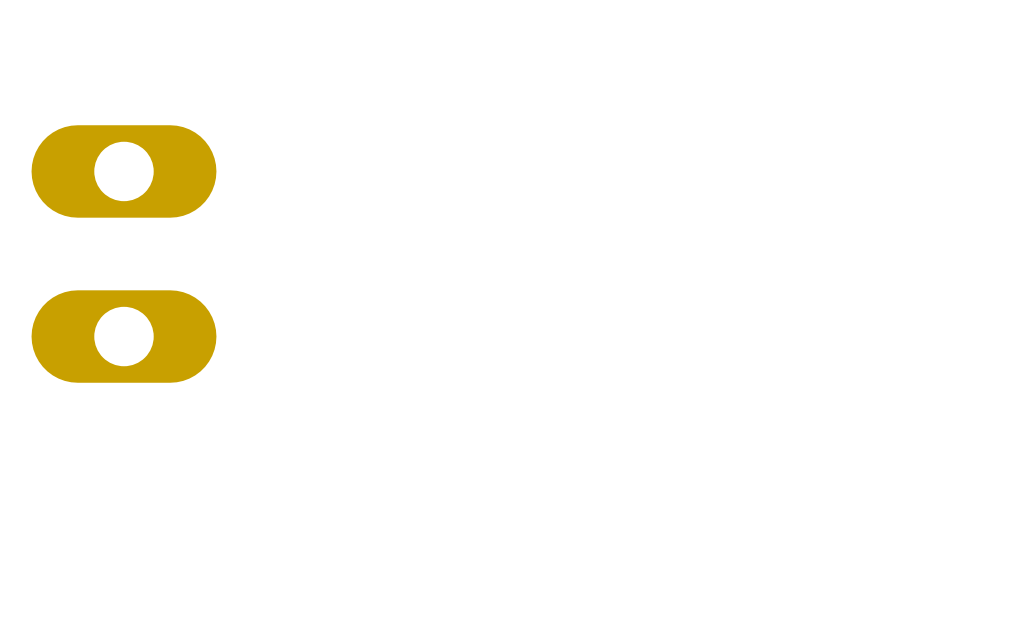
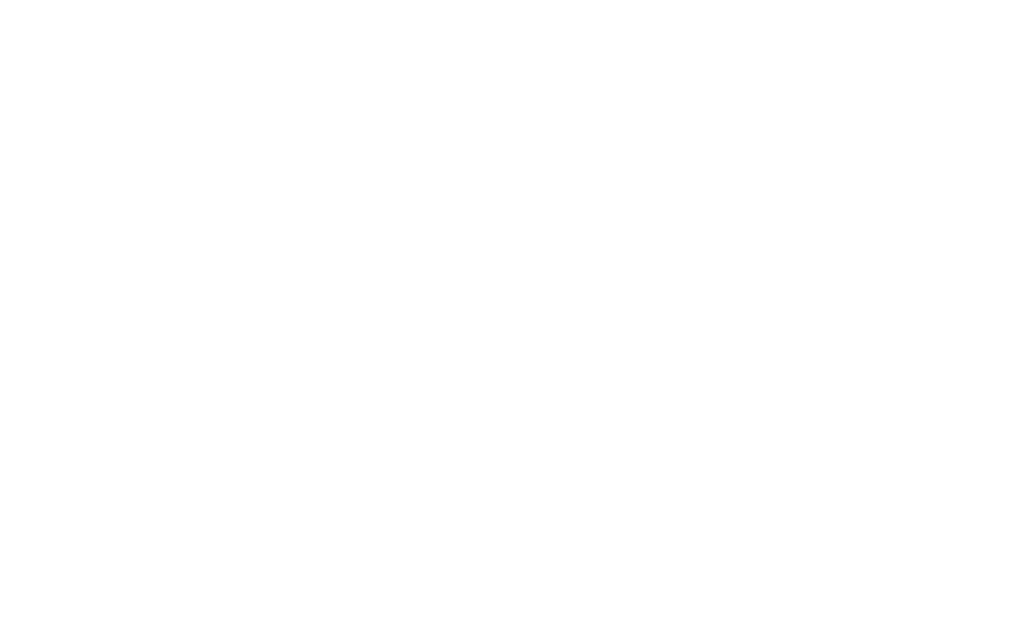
part: (123, 254) -> none

